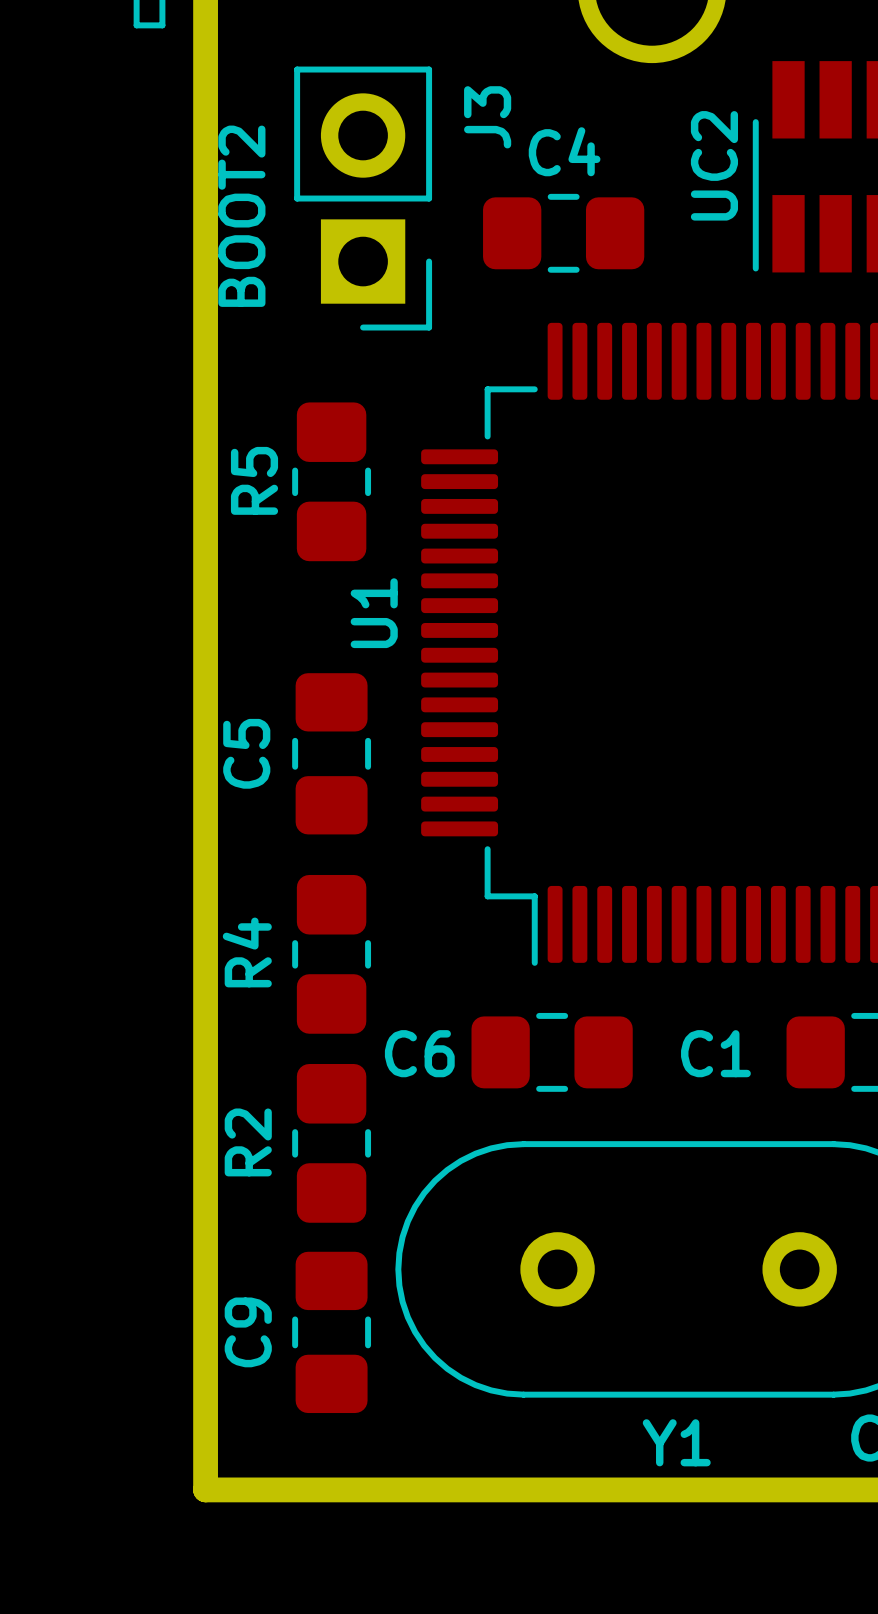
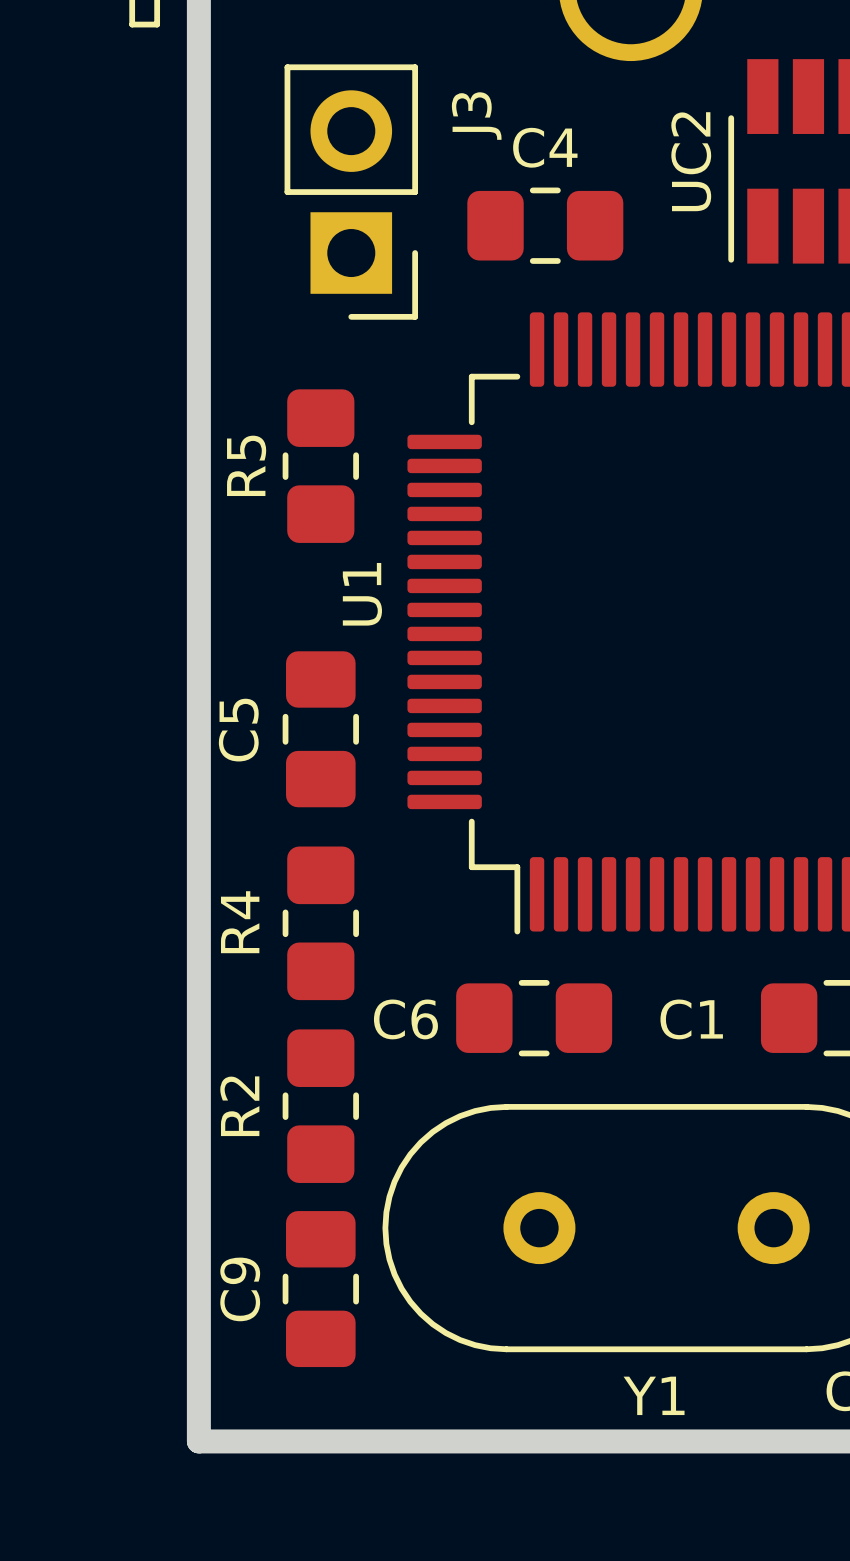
text: BOOT2 (241, 216) -> none

